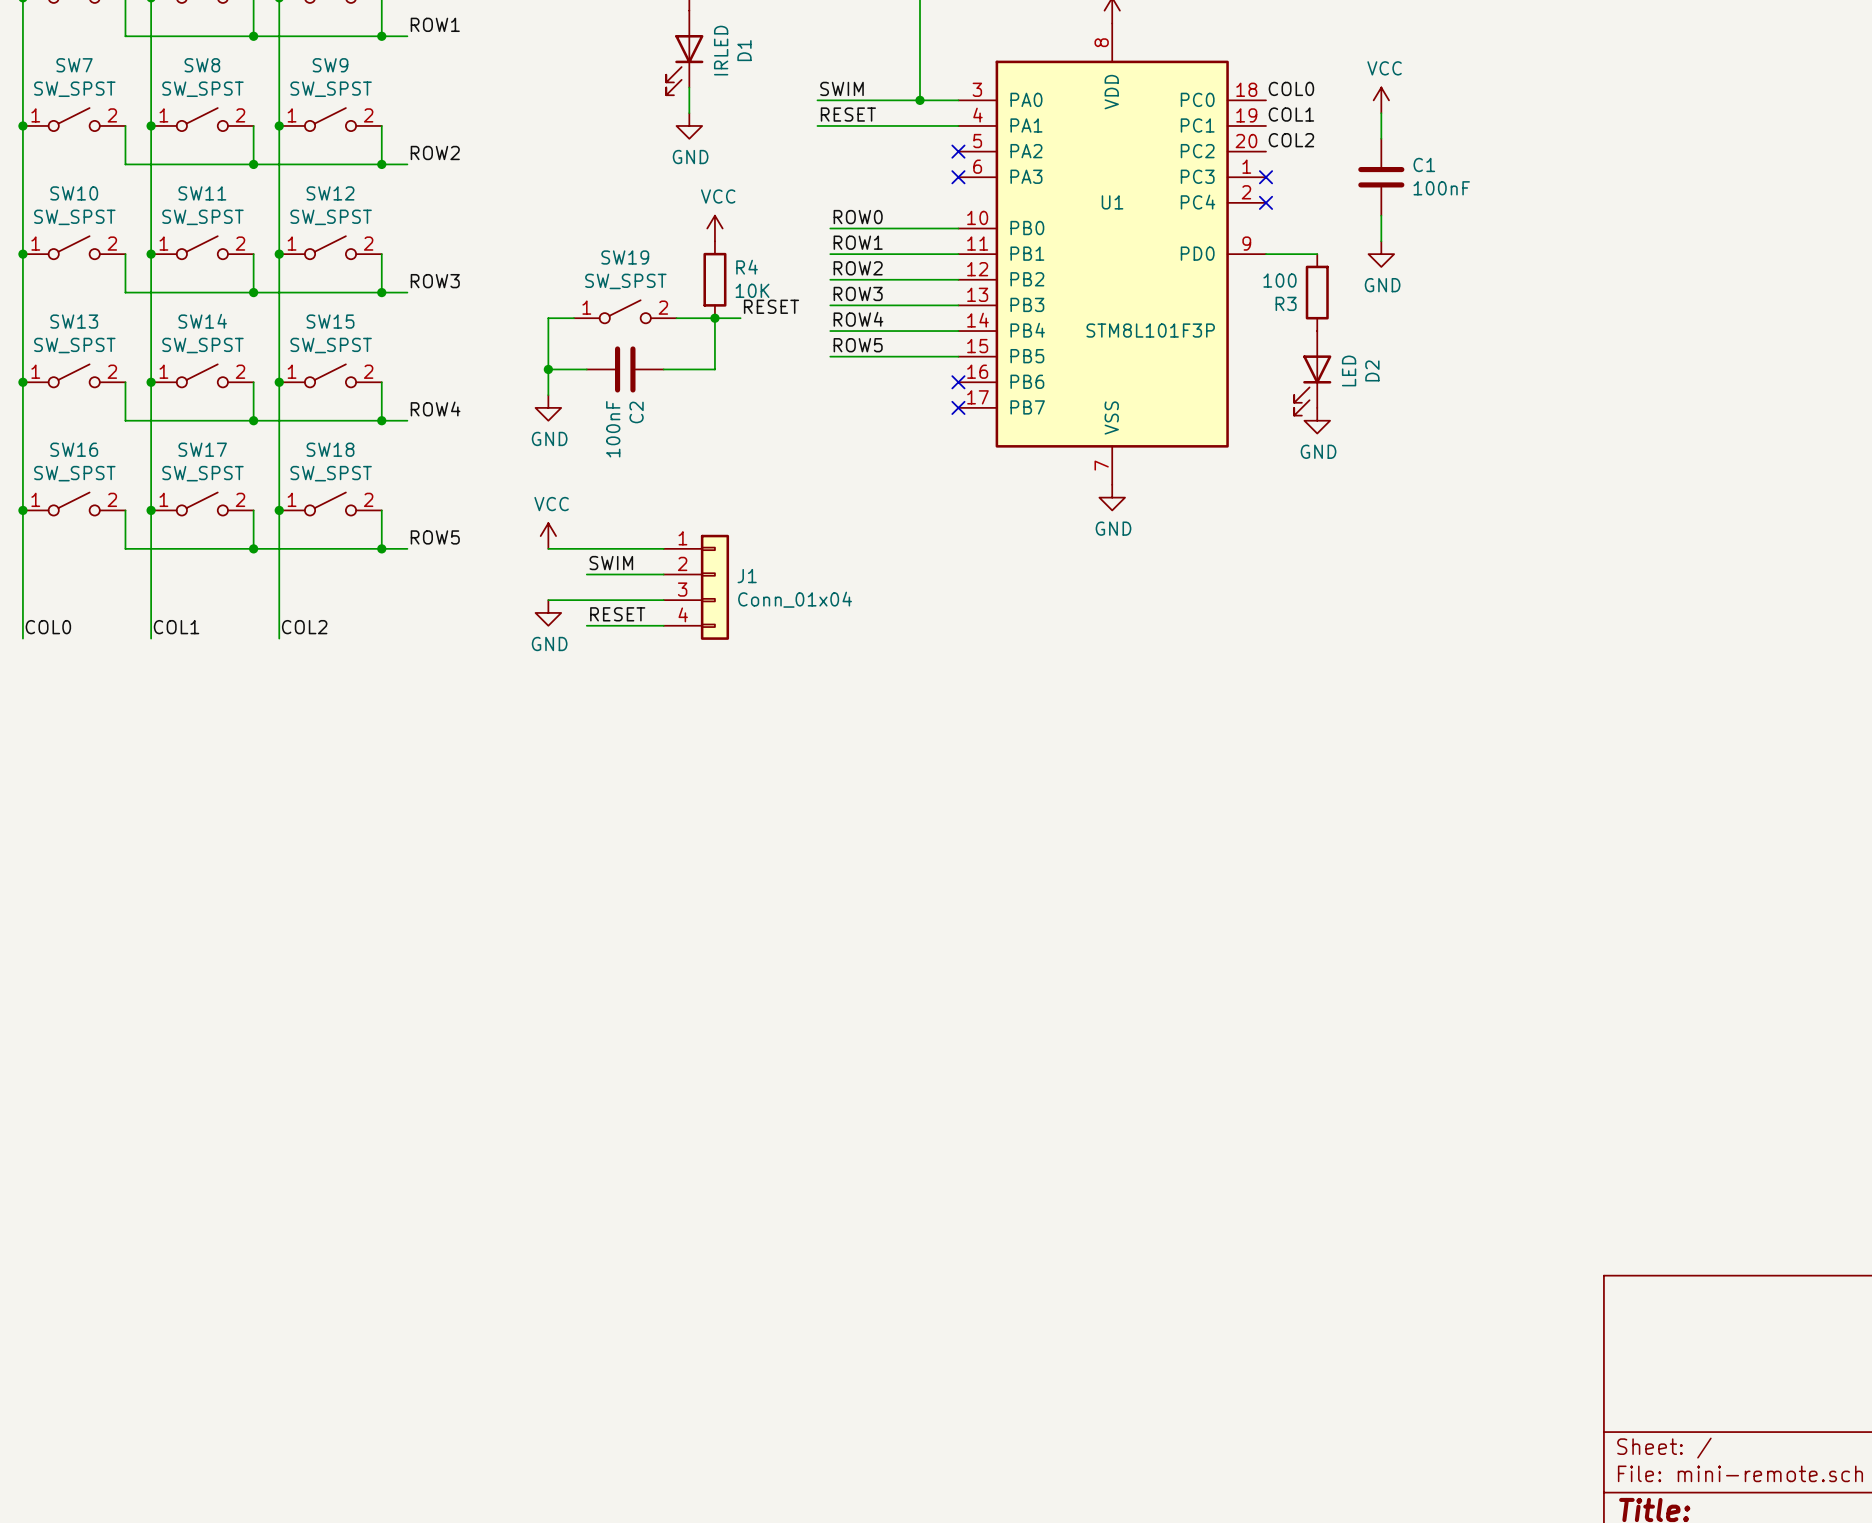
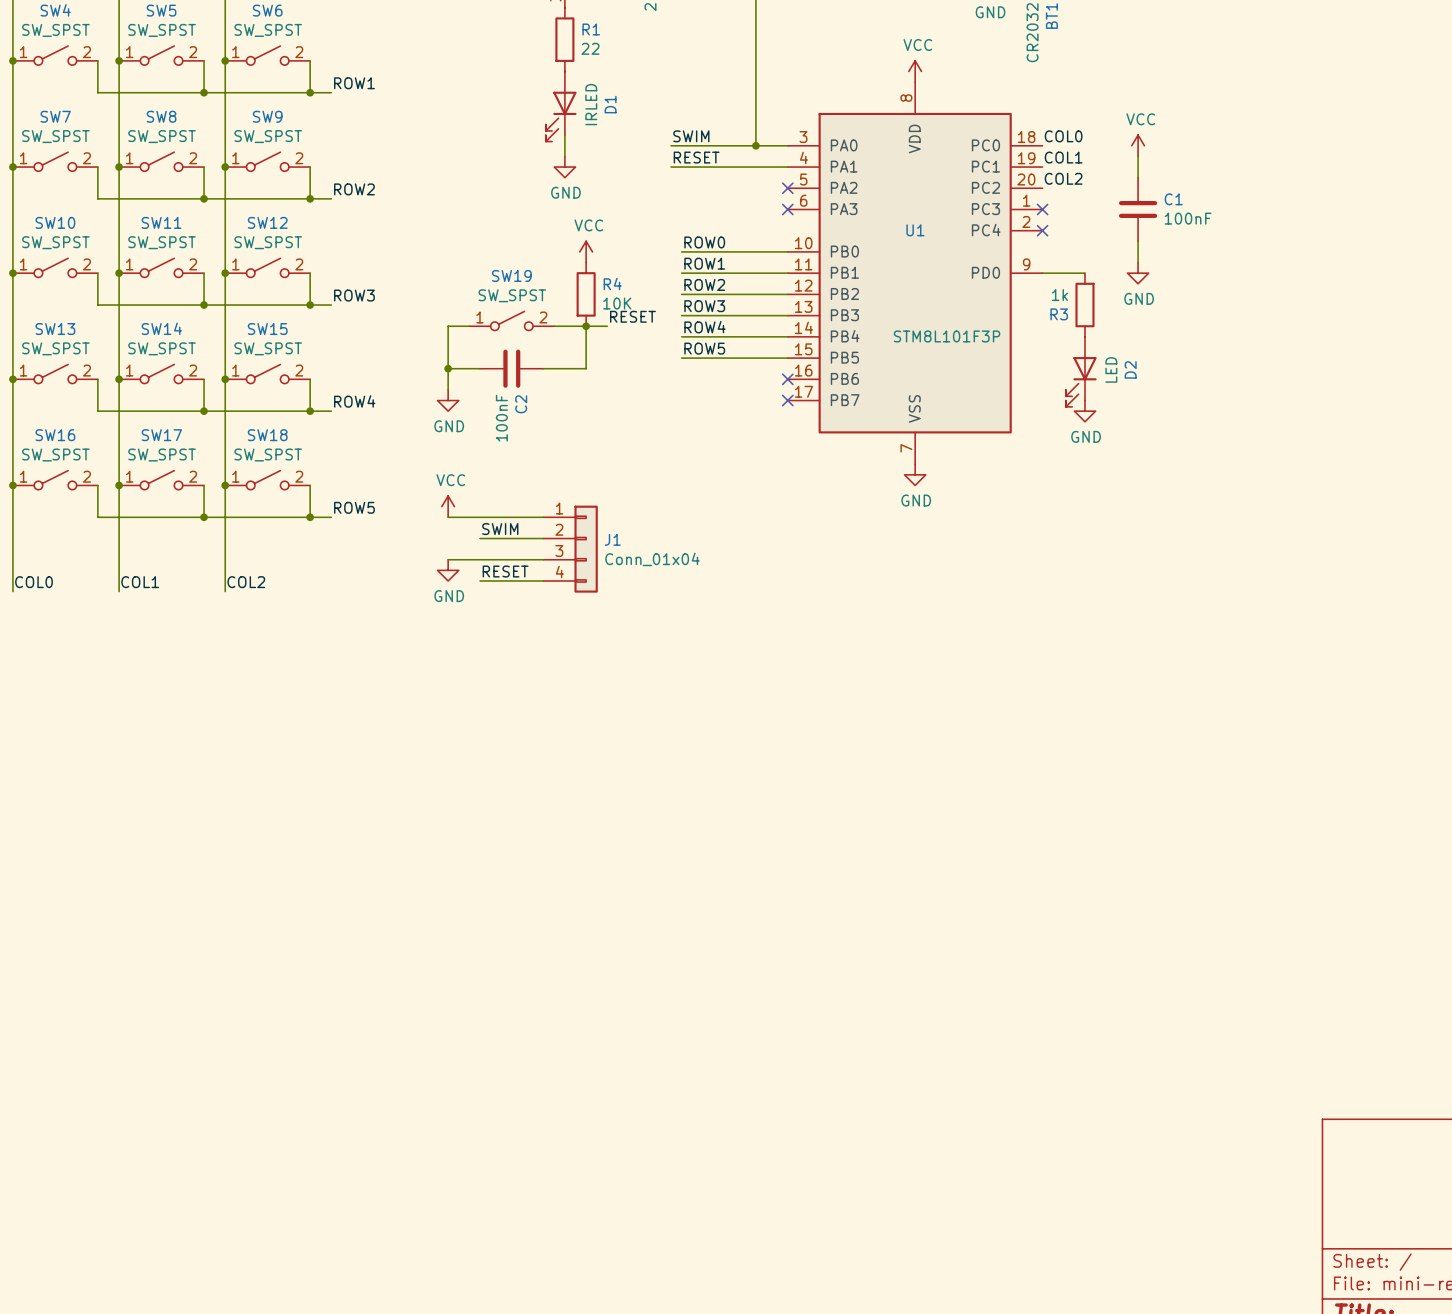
R3 value: 100 (1279, 280) -> 1k (1059, 295)

